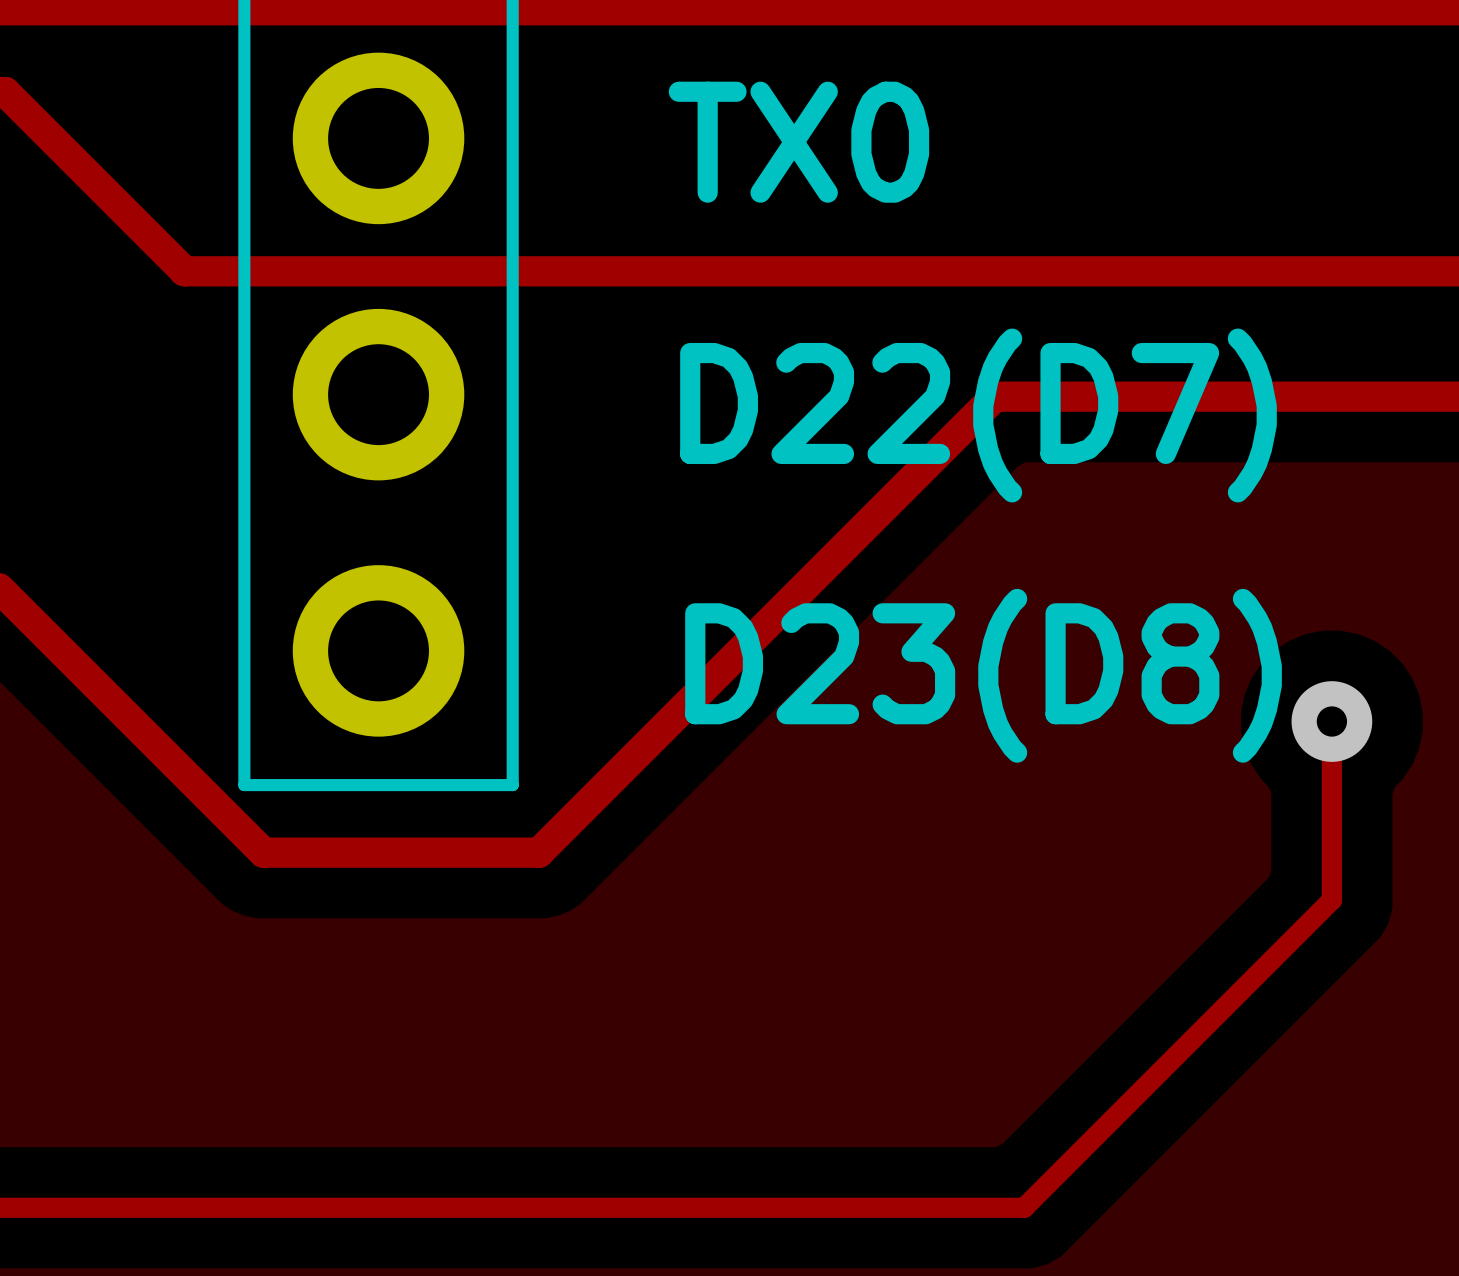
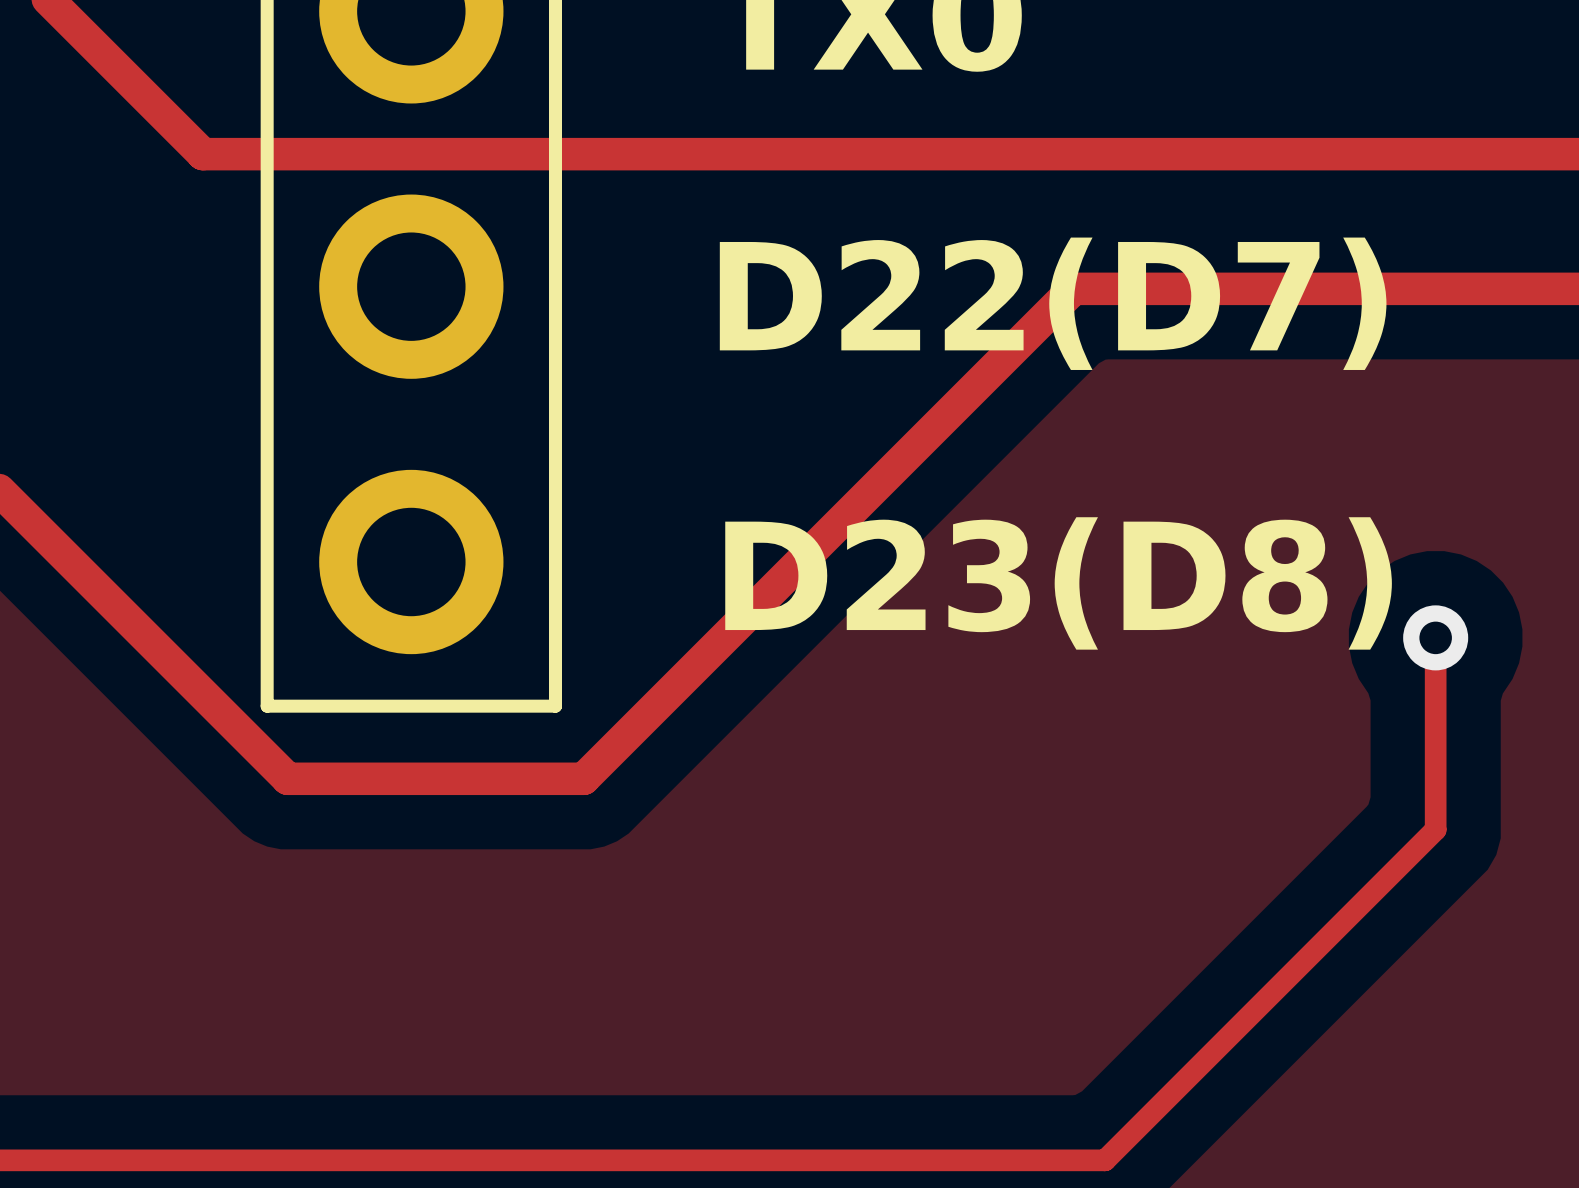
via size: [1291, 681, 1373, 762] -> [1403, 605, 1469, 671]

